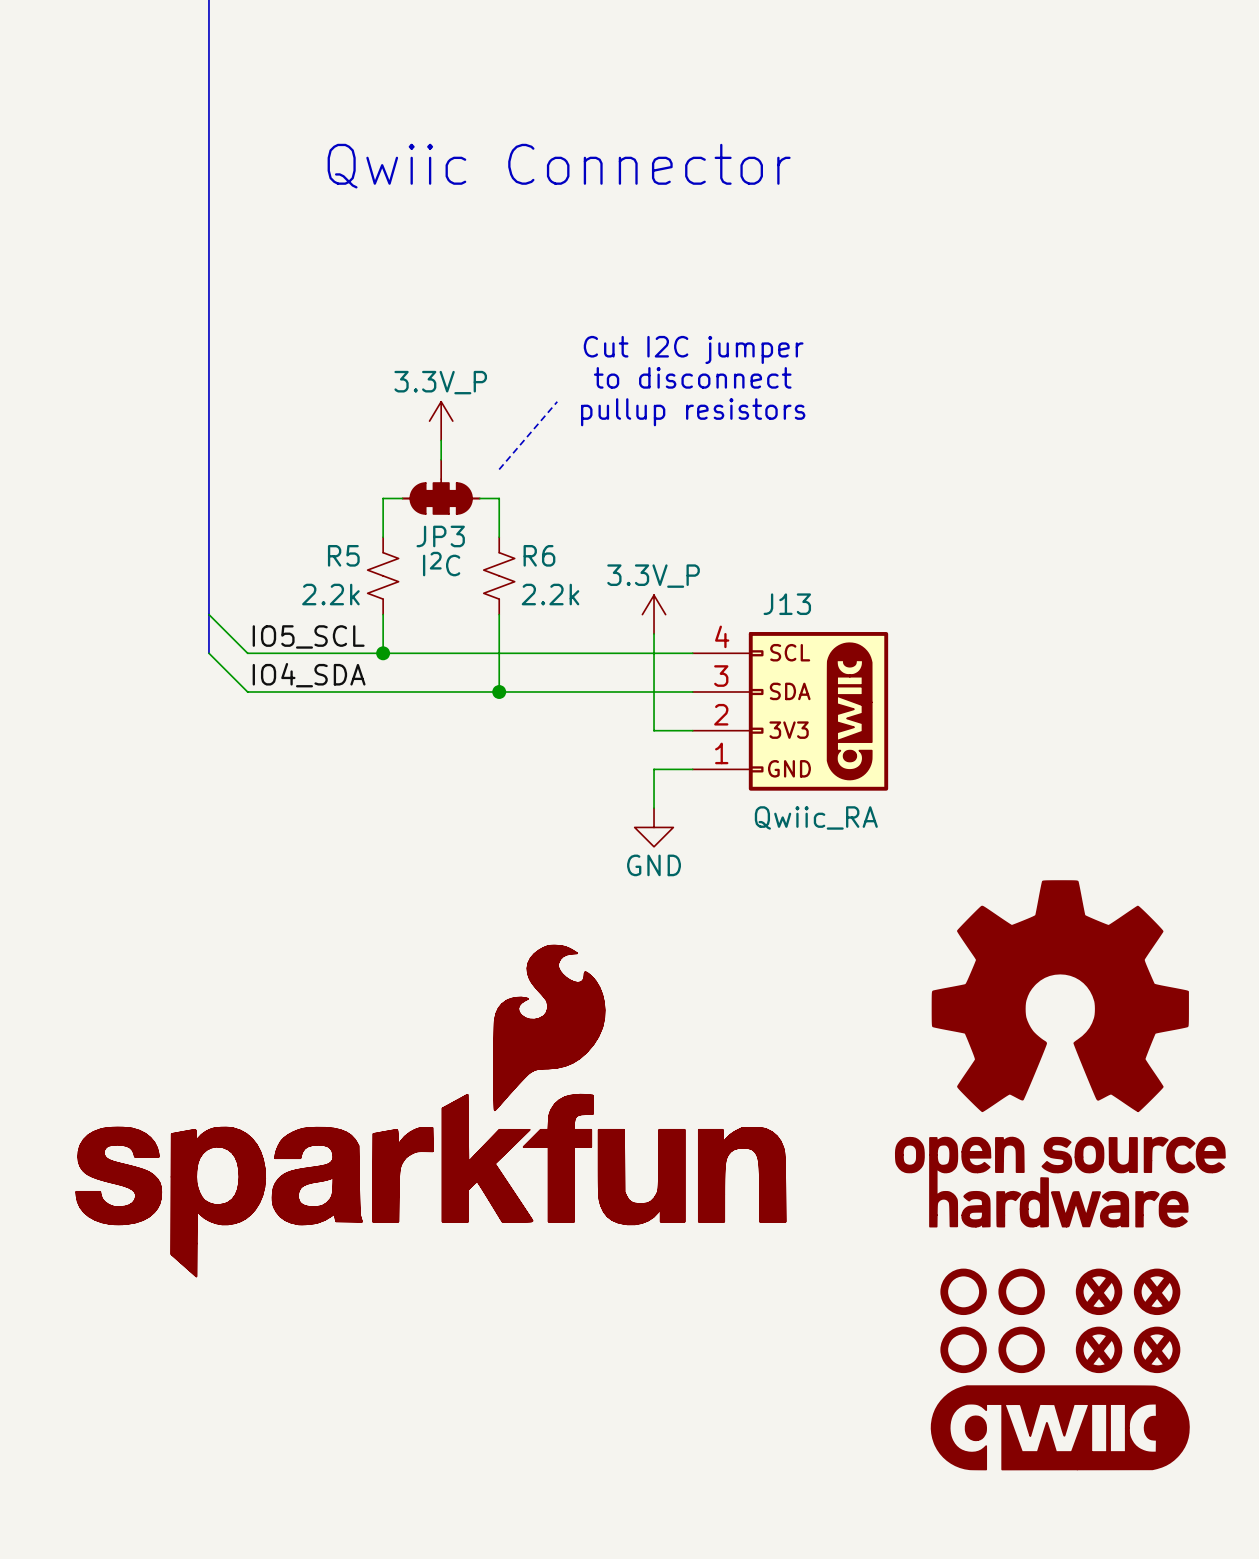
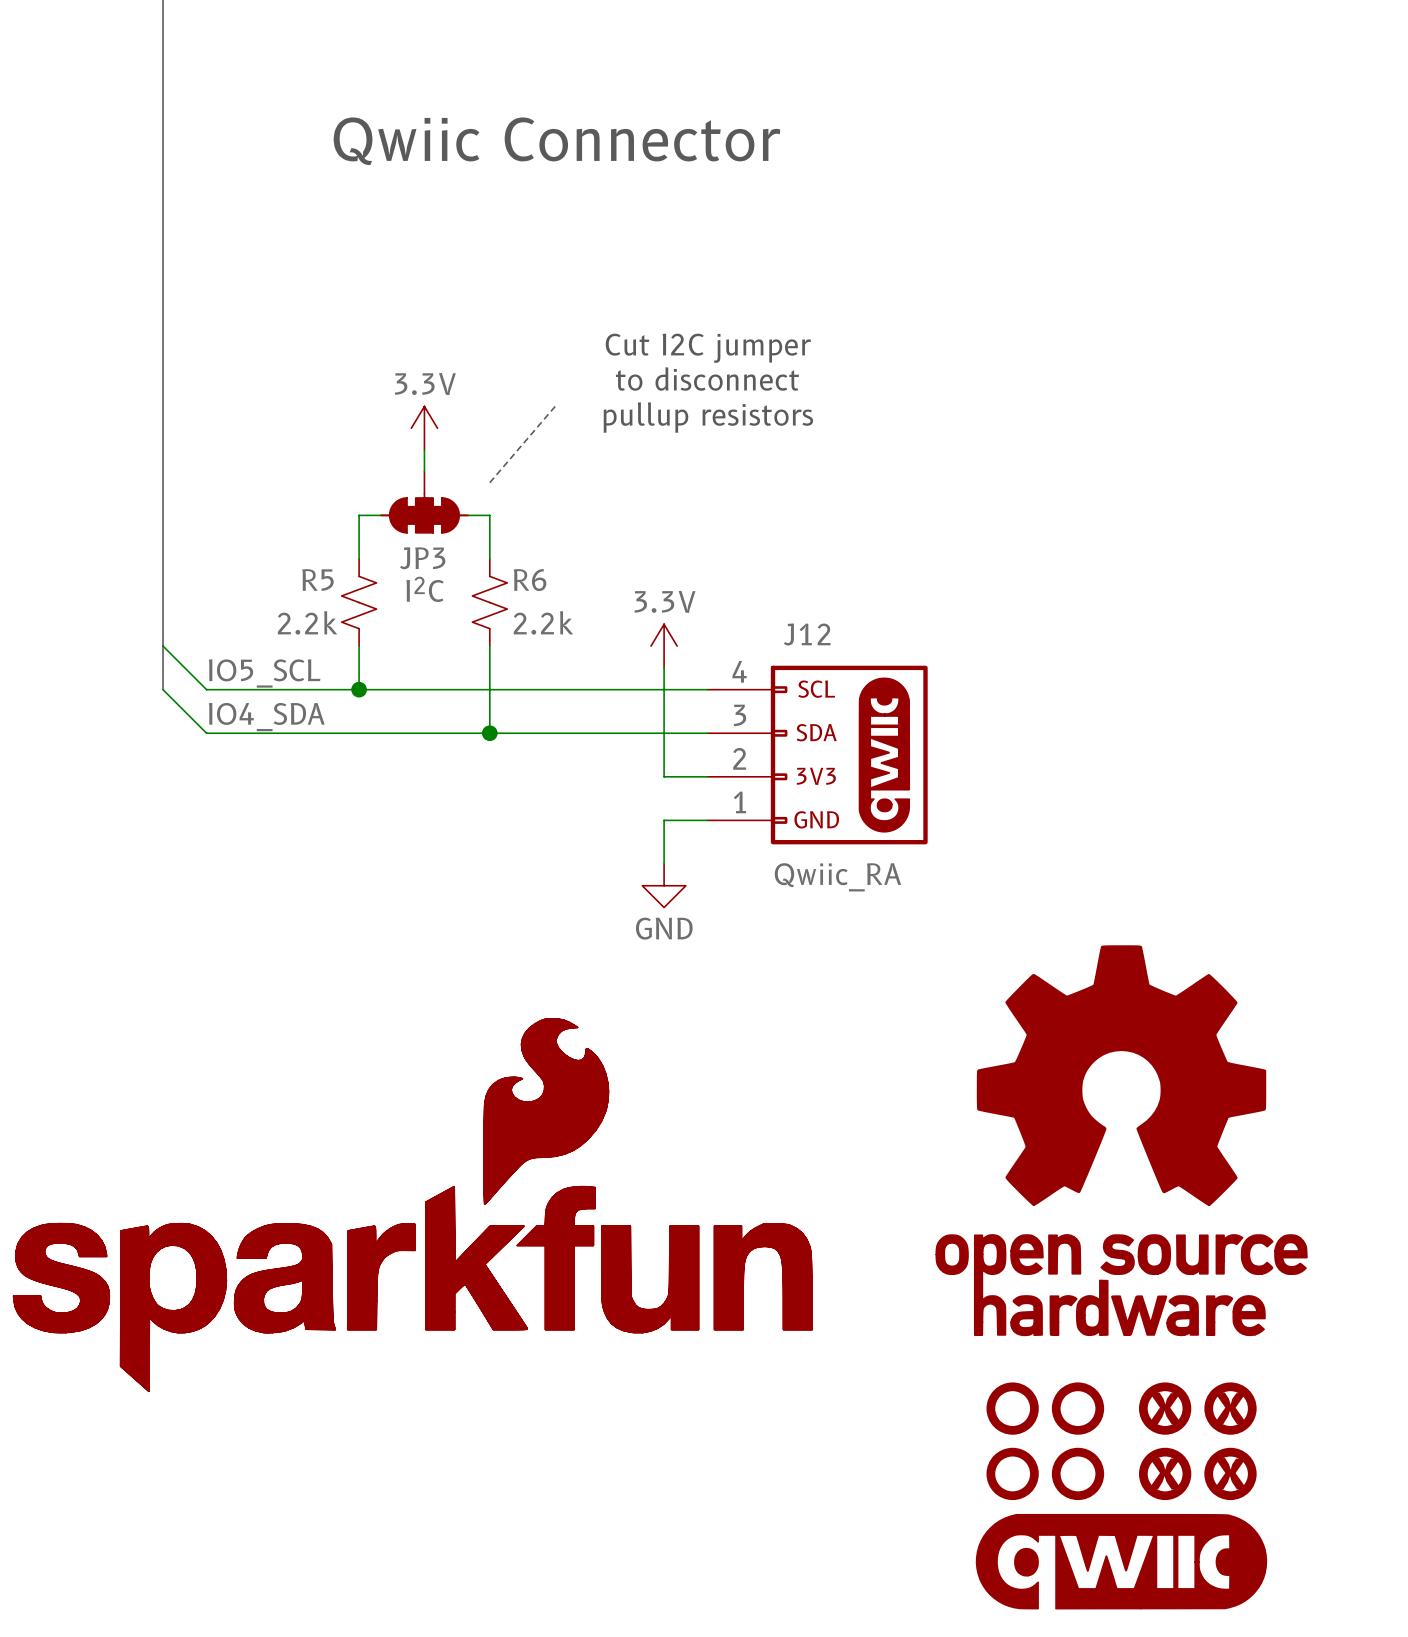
power symbol: 3.3V_P (441, 421) -> 3.3V (424, 428)
J13 name: J13 (787, 604) -> J12 (807, 634)
power symbol: 3.3V_P (654, 614) -> 3.3V (664, 646)

